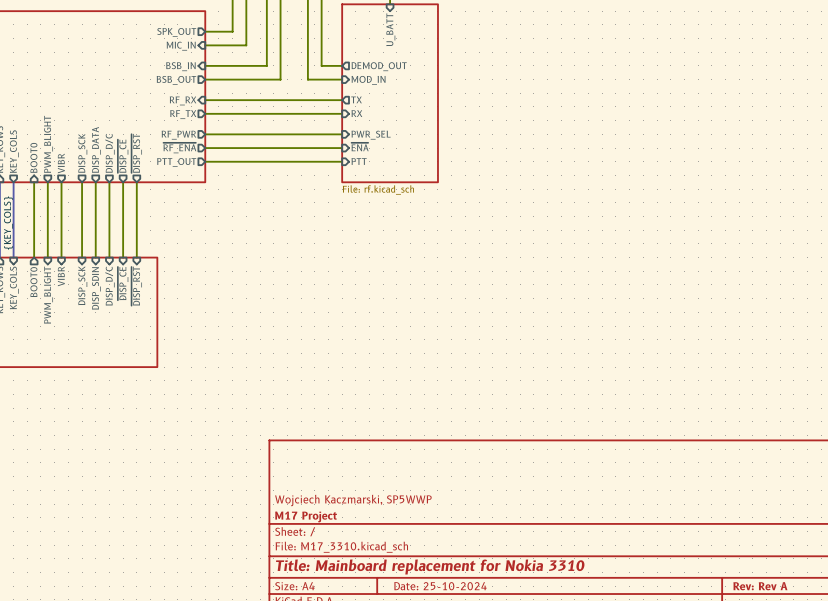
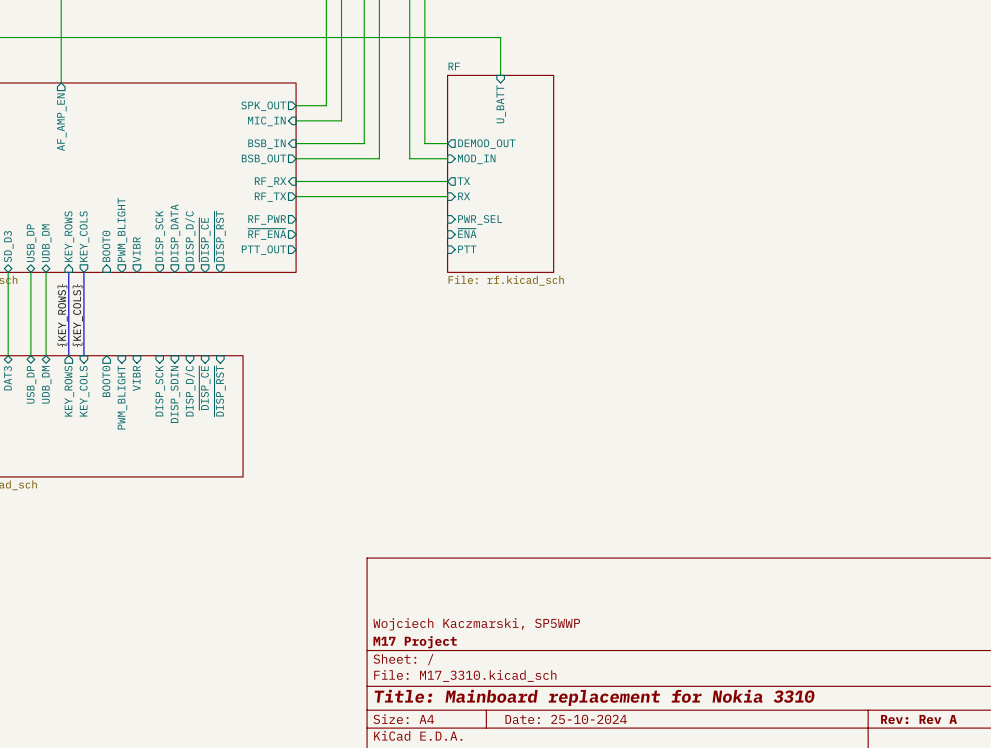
wire: (205, 134) (342, 134) -> none
wire: (205, 148) (342, 148) -> none
wire: (205, 161) (342, 161) -> none
wire: (34, 182) (34, 257) -> none
wire: (47, 182) (47, 257) -> none
wire: (61, 182) (61, 257) -> none
wire: (82, 182) (82, 257) -> none
wire: (95, 182) (95, 257) -> none
wire: (109, 182) (109, 257) -> none
wire: (123, 182) (123, 257) -> none
wire: (136, 182) (136, 257) -> none

